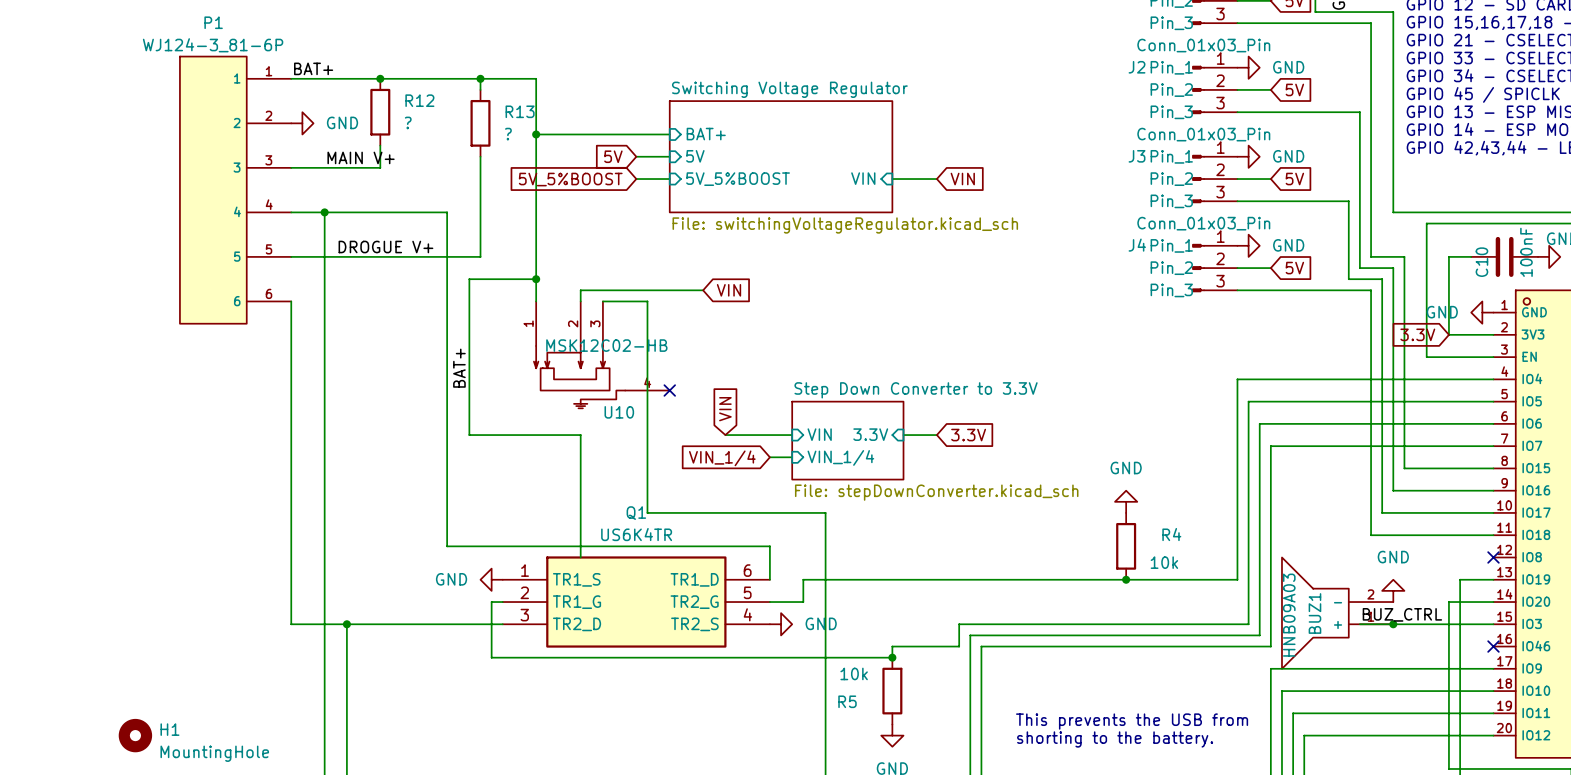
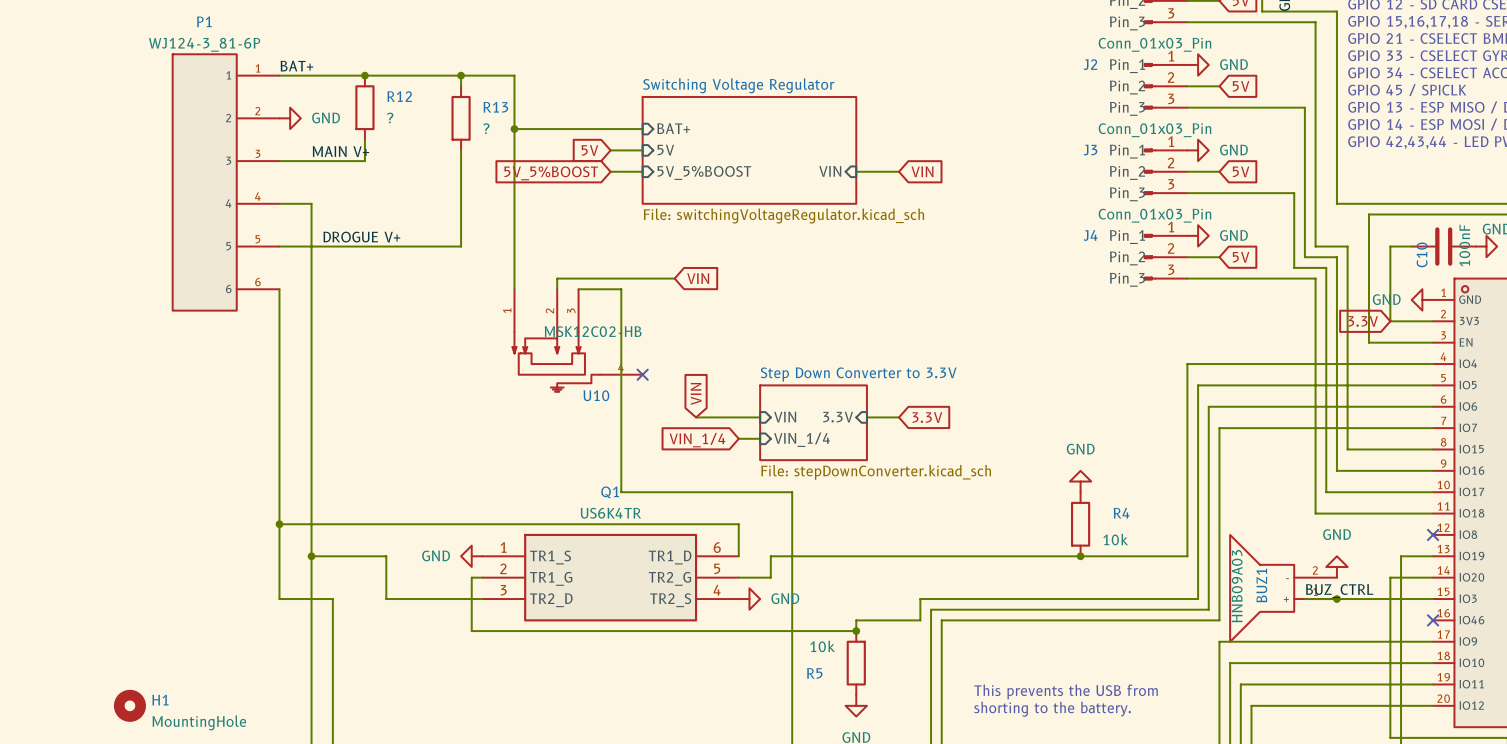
wire: (324, 212) (447, 212) (447, 546) -> (279, 524) (429, 524)
junction: (324, 212) -> none
wire: (536, 279) (469, 279) (469, 435) (580, 435) (580, 557) -> none
junction: (536, 279) -> none
label: BAT+ (459, 368) -> none
junction: none -> (279, 524)
junction: none -> (311, 556)
wire: (346, 624) (402, 624) -> (311, 556) (386, 556) (386, 599)
junction: (346, 624) -> none

